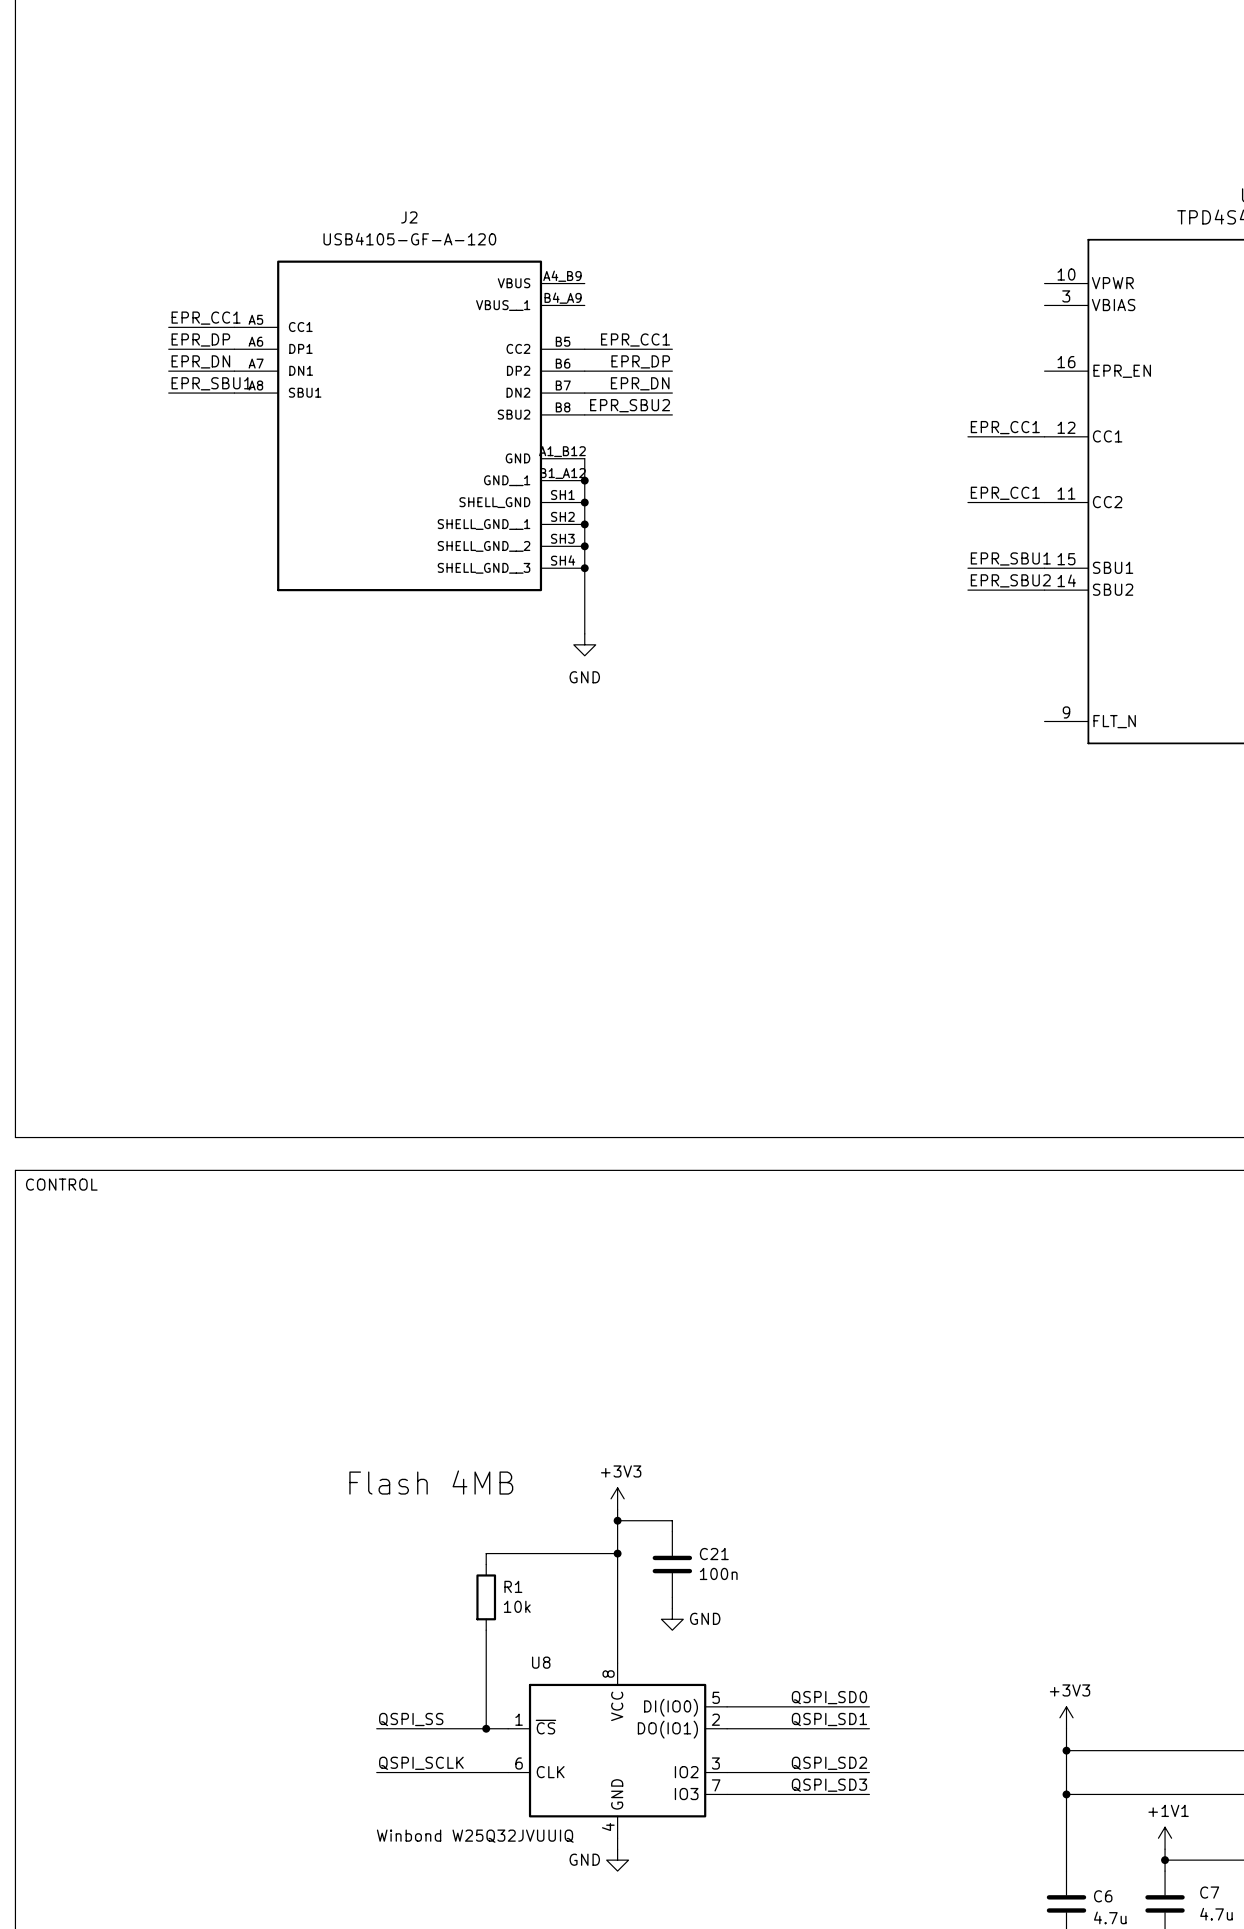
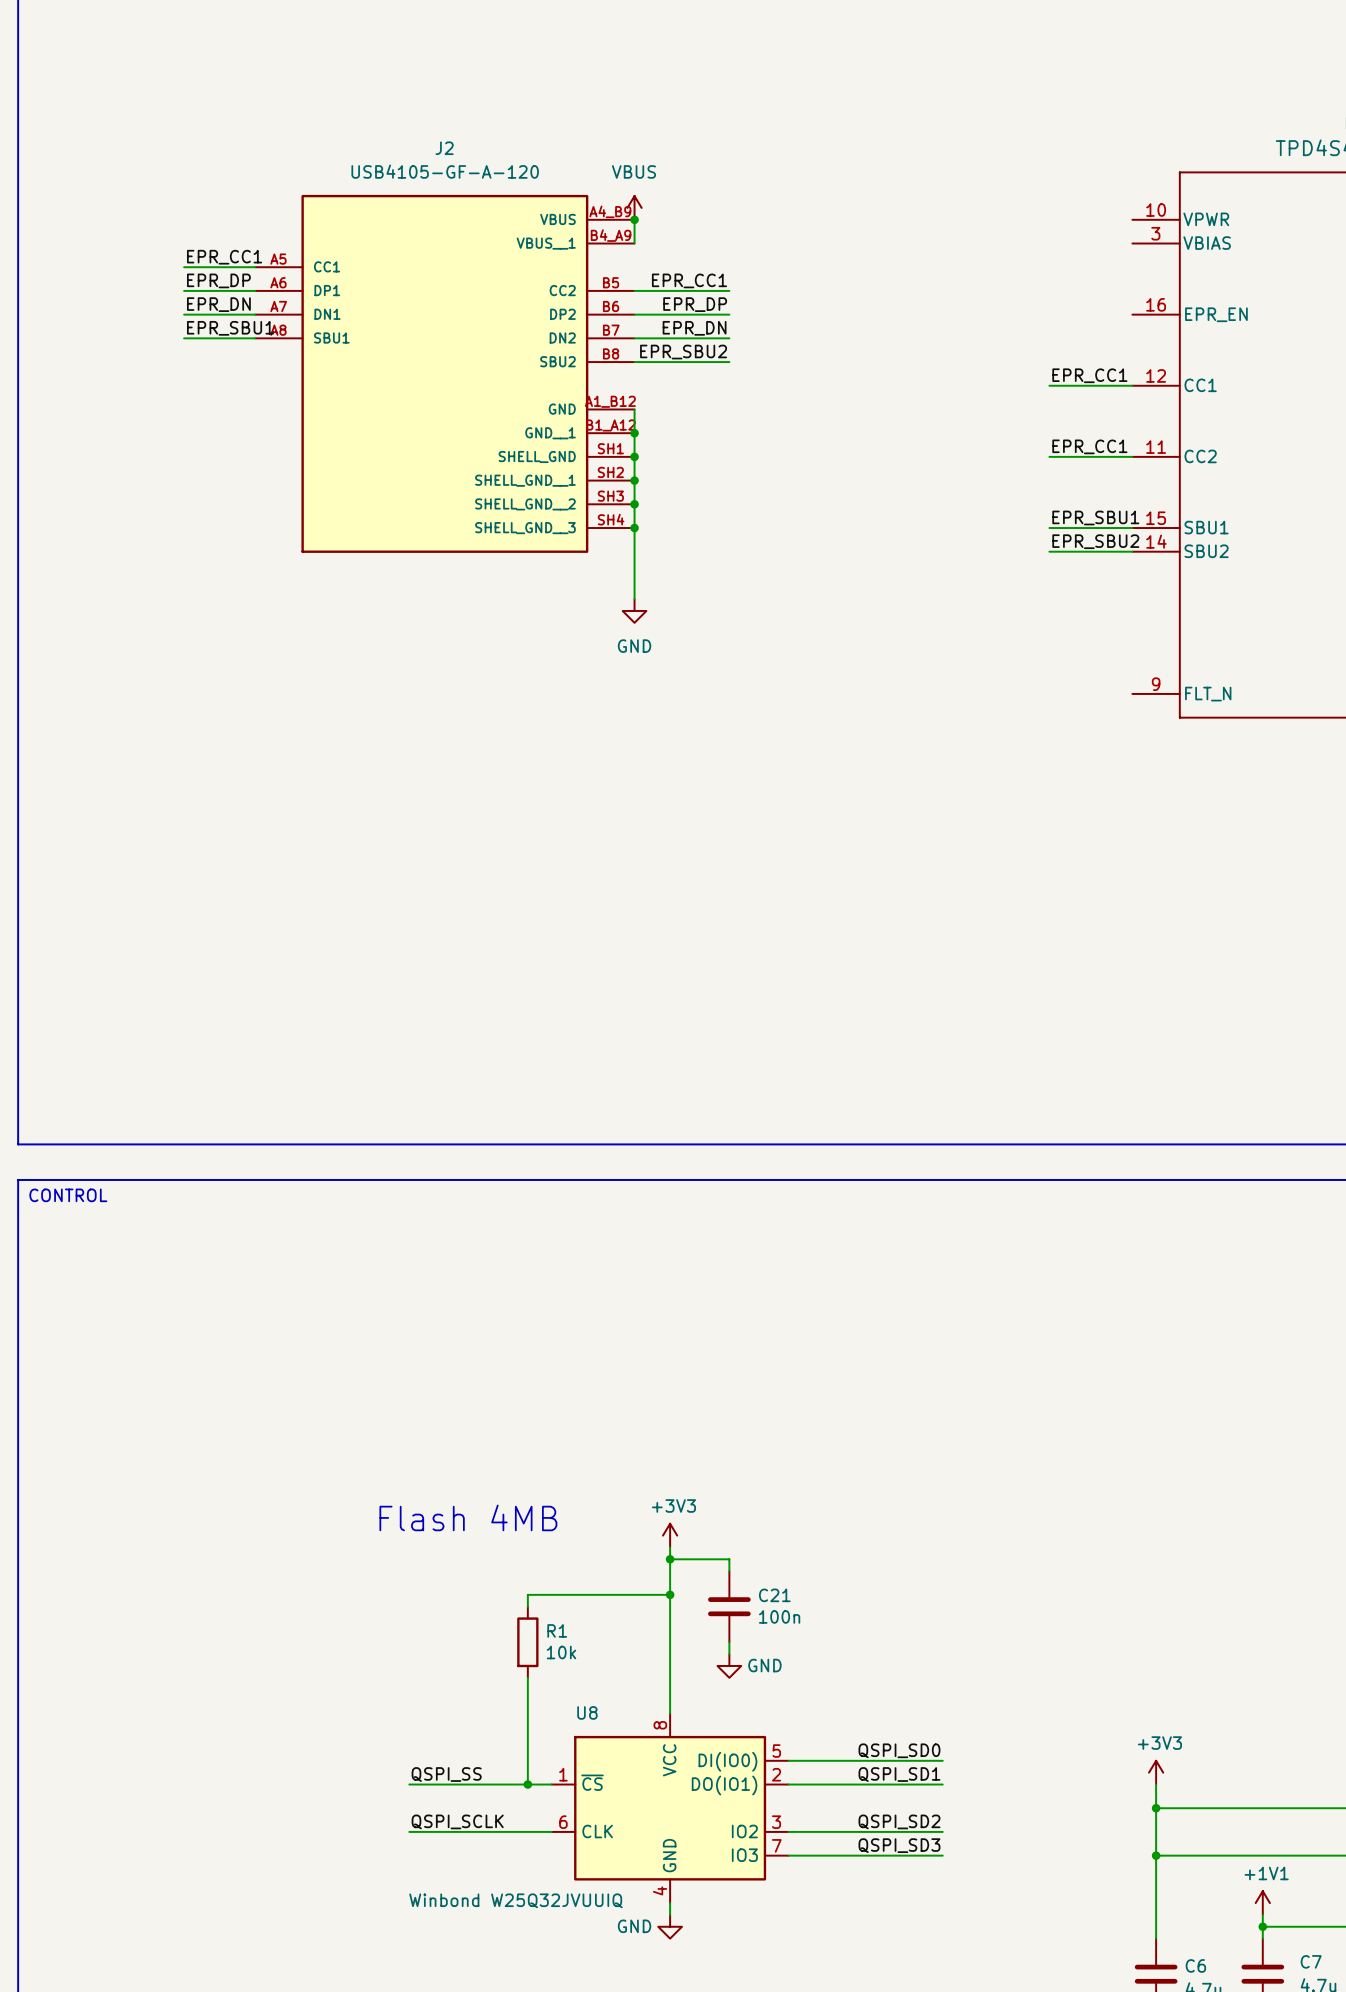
power symbol: none -> VBUS (634, 207)
wire: none -> (634, 219) (634, 243)
junction: none -> (634, 219)

